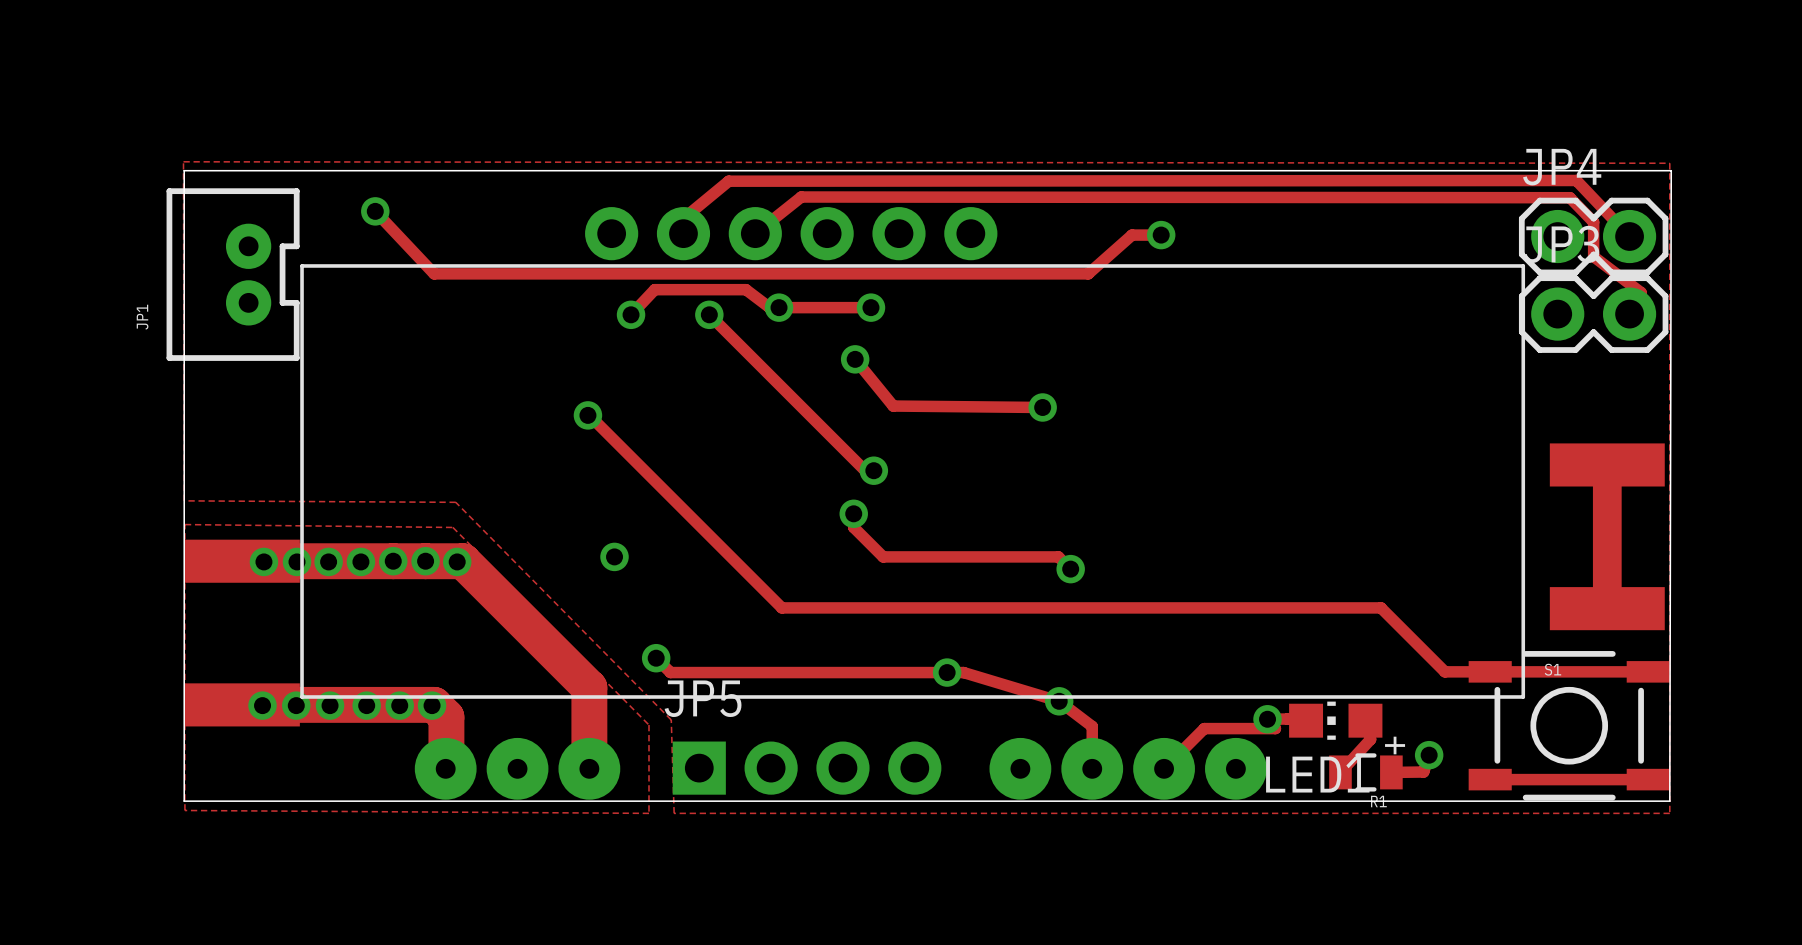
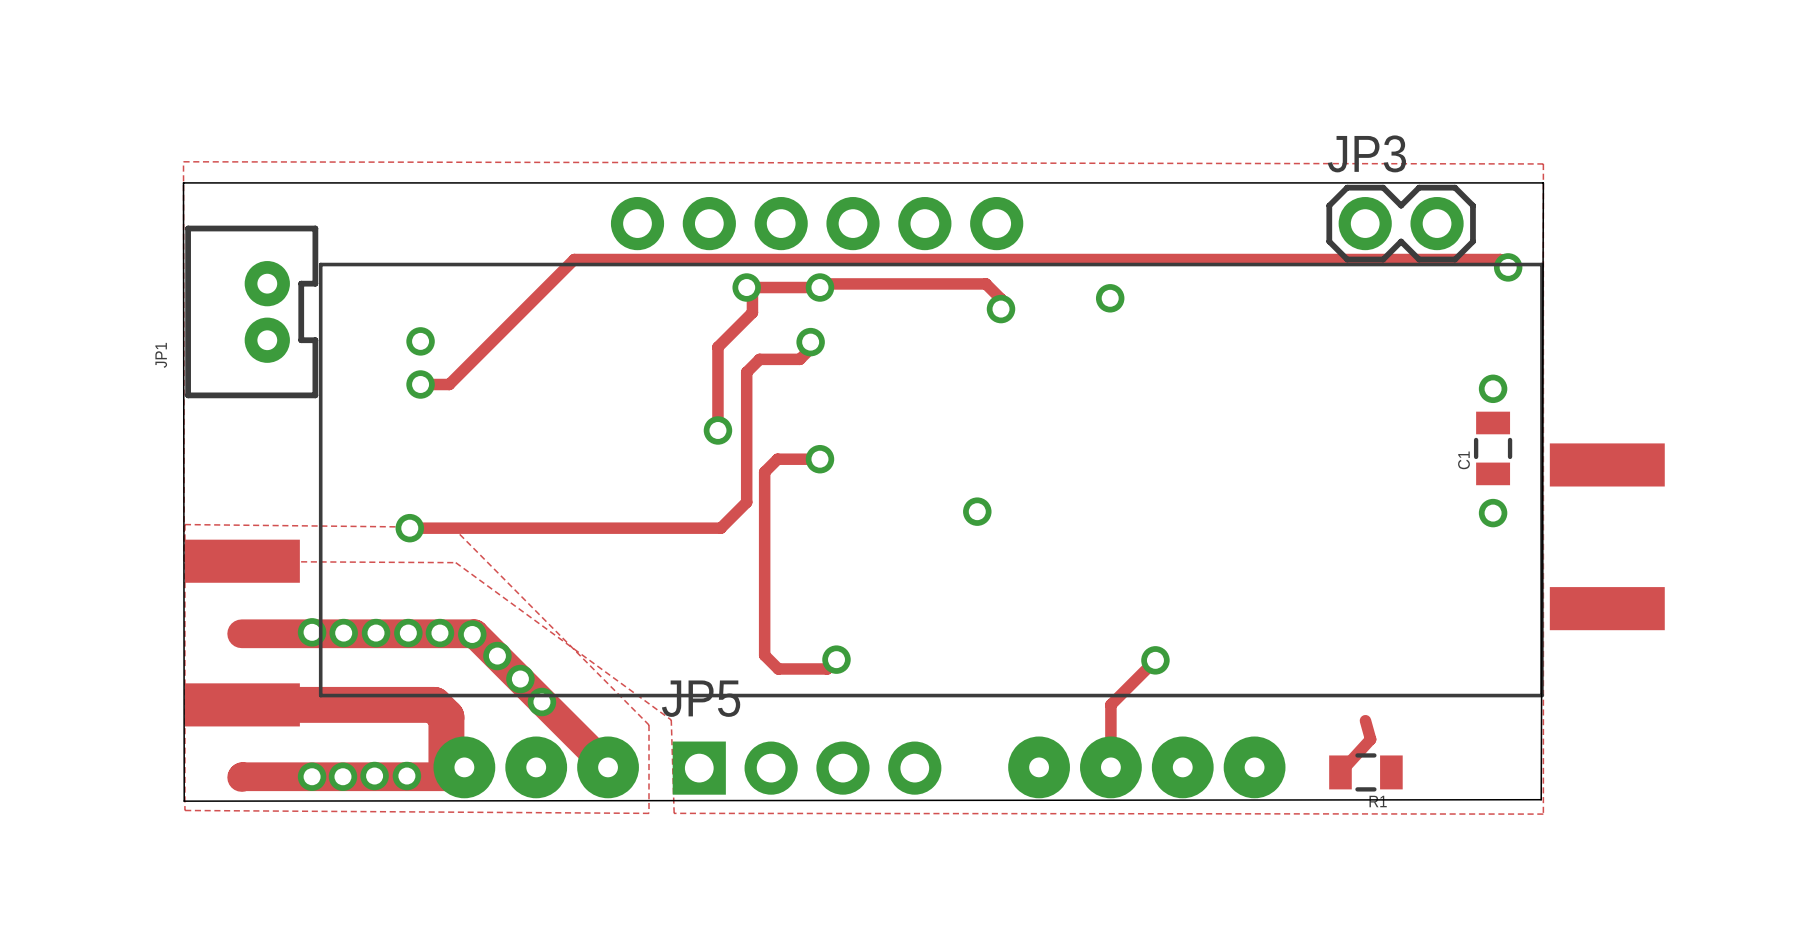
board edge: (184, 170) (1671, 170) (1669, 801) (184, 801) (184, 170) -> (183, 182) (184, 801) (1541, 799) (1543, 182) (183, 182)
track: (375, 211) (434, 273) (1088, 273) (1132, 235) (1161, 235) -> none
via: (375, 211) -> none
track: (683, 233) (683, 218) (728, 181) (1576, 180) (1629, 236) -> none
track: (755, 233) (801, 197) (1569, 197) (1593, 222) (1593, 256) (1641, 292) (1629, 314) -> none
part position: (791, 233) -> (817, 223)
via: (1161, 235) -> none
JP4: (1593, 236) -> none
track: none -> (1508, 267) (1500, 259) (574, 259) (449, 384) (420, 384)
via: none -> (1508, 267)
JP1 position: (233, 274) -> (251, 311)
via: none -> (746, 287)
via: none -> (819, 287)
via: none -> (1110, 298)
via: (779, 307) -> none
track: (870, 307) (769, 307) (745, 289) (654, 289) (631, 314) -> none
via: (870, 307) -> none
track: none -> (1001, 309) (1001, 299) (985, 283) (823, 283) (819, 287) (746, 287) (752, 293) (752, 312) (717, 347) (717, 430)
via: none -> (1001, 309)
via: (631, 314) -> none
track: (709, 314) (865, 470) (873, 470) -> none
via: (709, 314) -> none
JP3 position: (1593, 314) -> (1401, 223)
via: none -> (420, 341)
track: none -> (810, 342) (810, 348) (799, 359) (759, 359) (746, 372) (746, 502) (720, 528) (409, 528)
via: none -> (810, 342)
track: (855, 359) (893, 406) (1042, 407) -> none
via: (855, 359) -> none
via: none -> (420, 384)
via: none -> (1493, 388)
via: (1042, 407) -> none
track: (587, 415) (781, 607) (1381, 607) (1444, 671) (1648, 671) -> none
via: (587, 415) -> none
via: none -> (717, 430)
C1: none -> (1493, 448)
track: none -> (819, 459) (777, 459) (764, 472) (764, 655) (778, 668) (827, 668) (836, 659)
via: none -> (819, 459)
track: (1607, 464) (1607, 608) -> none
via: (873, 470) -> none
via: none -> (977, 511)
track: (853, 513) (853, 527) (883, 556) (1058, 556) (1070, 569) -> none
via: (853, 513) -> none
via: none -> (1493, 513)
via: none -> (409, 528)
part position: (912, 531) -> (931, 530)
via: (614, 556) -> none
track: (242, 561) (462, 561) (589, 687) (590, 768) -> none
via: (263, 561) -> none
via: (297, 561) -> none
via: (328, 561) -> none
via: (360, 561) -> none
via: (393, 561) -> none
via: (425, 561) -> none
via: (457, 561) -> none
via: (1070, 569) -> none
via: none -> (312, 632)
track: none -> (241, 633) (474, 633) (608, 768)
via: none -> (343, 633)
via: none -> (376, 633)
via: none -> (408, 633)
via: none -> (439, 633)
via: none -> (472, 634)
via: none -> (497, 656)
track: (656, 658) (670, 672) (963, 672) (1059, 701) (1092, 726) (1092, 768) -> none
via: (656, 658) -> none
via: none -> (836, 659)
track: none -> (1155, 660) (1110, 704) (1110, 767)
via: none -> (1155, 660)
via: (947, 672) -> none
via: none -> (520, 679)
via: (1059, 701) -> none
via: none -> (541, 702)
via: (262, 705) -> none
via: (296, 705) -> none
via: (330, 705) -> none
via: (366, 705) -> none
via: (399, 705) -> none
via: (432, 705) -> none
zone outline: (671, 719) (455, 502) (184, 500) (183, 161) (1669, 163) (1669, 813) (674, 813) -> (671, 719) (455, 562) (184, 561) (183, 161) (1543, 163) (1543, 814) (674, 813)
via: (1267, 719) -> none
track: (1306, 720) (1267, 719) (1275, 728) (1204, 728) (1164, 768) -> none
LED1: (1335, 720) -> none
S1: (1569, 725) -> none
track: (1429, 755) (1423, 772) (1391, 772) -> none
via: (1429, 755) -> none
track: none -> (464, 767) (455, 776) (241, 777)
via: none -> (312, 776)
via: none -> (342, 776)
via: none -> (374, 776)
via: none -> (406, 776)
track: (1490, 779) (1648, 779) -> none

